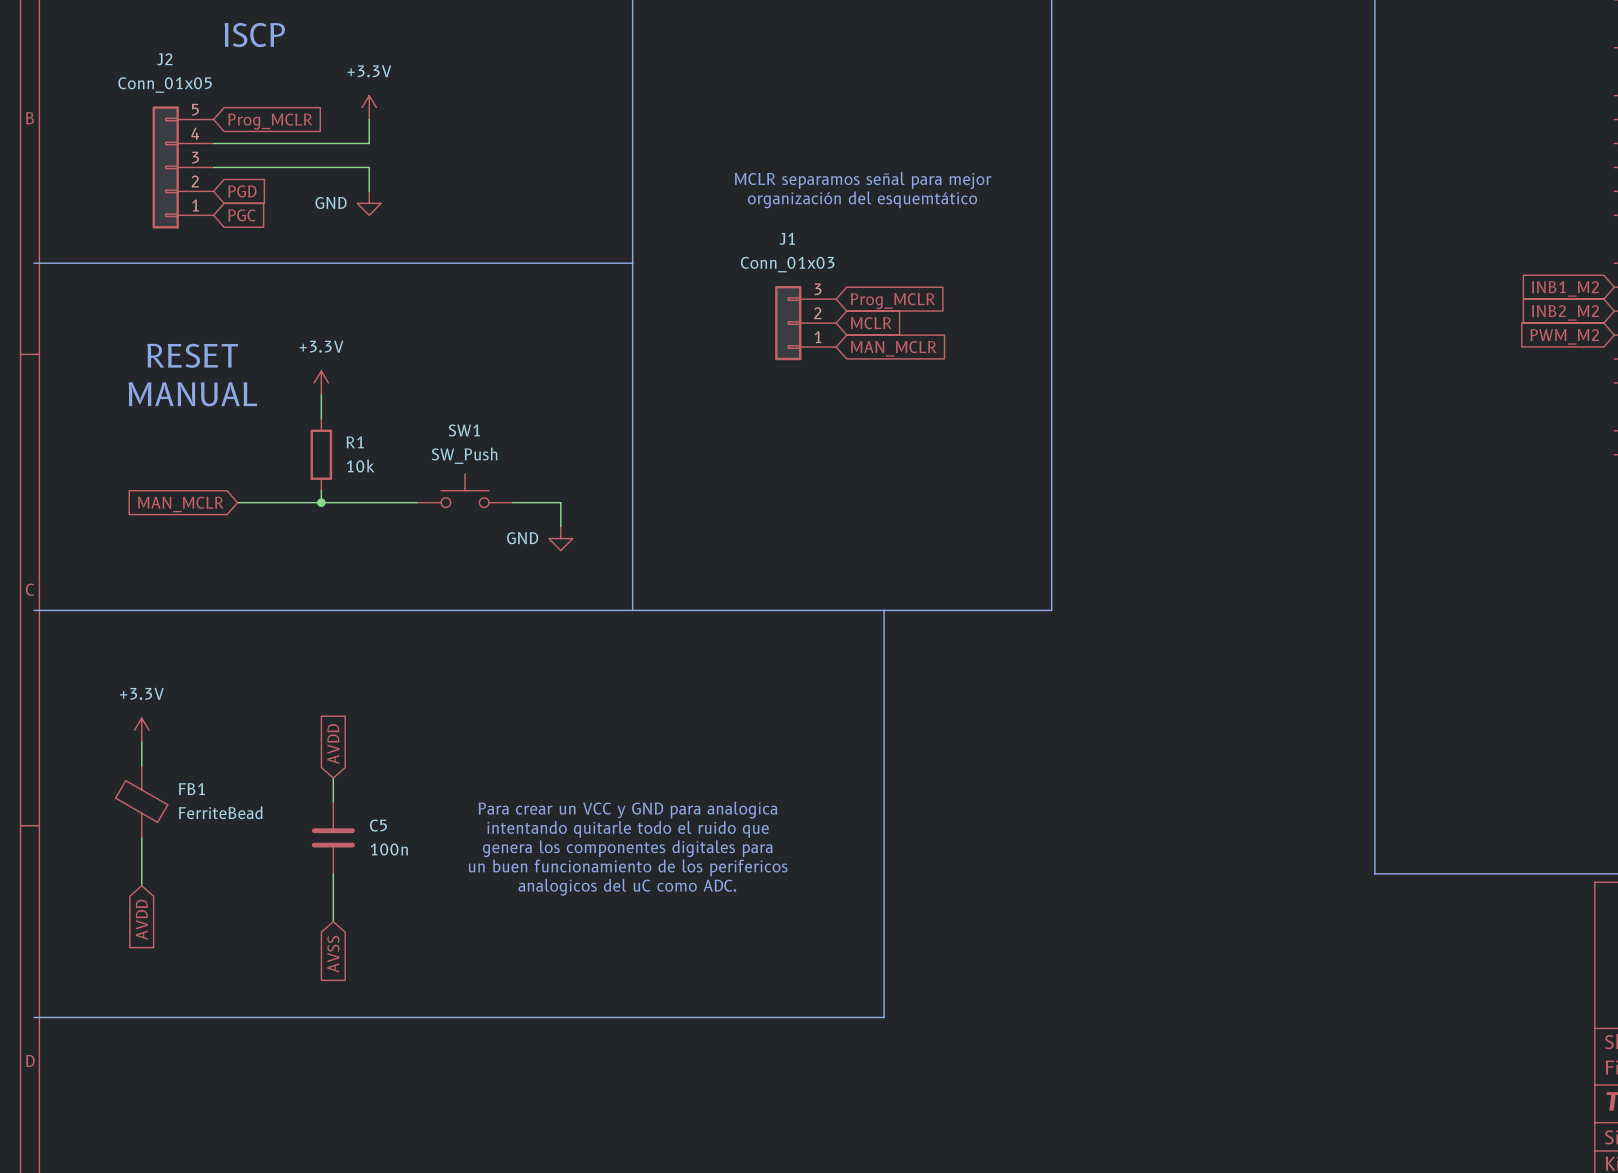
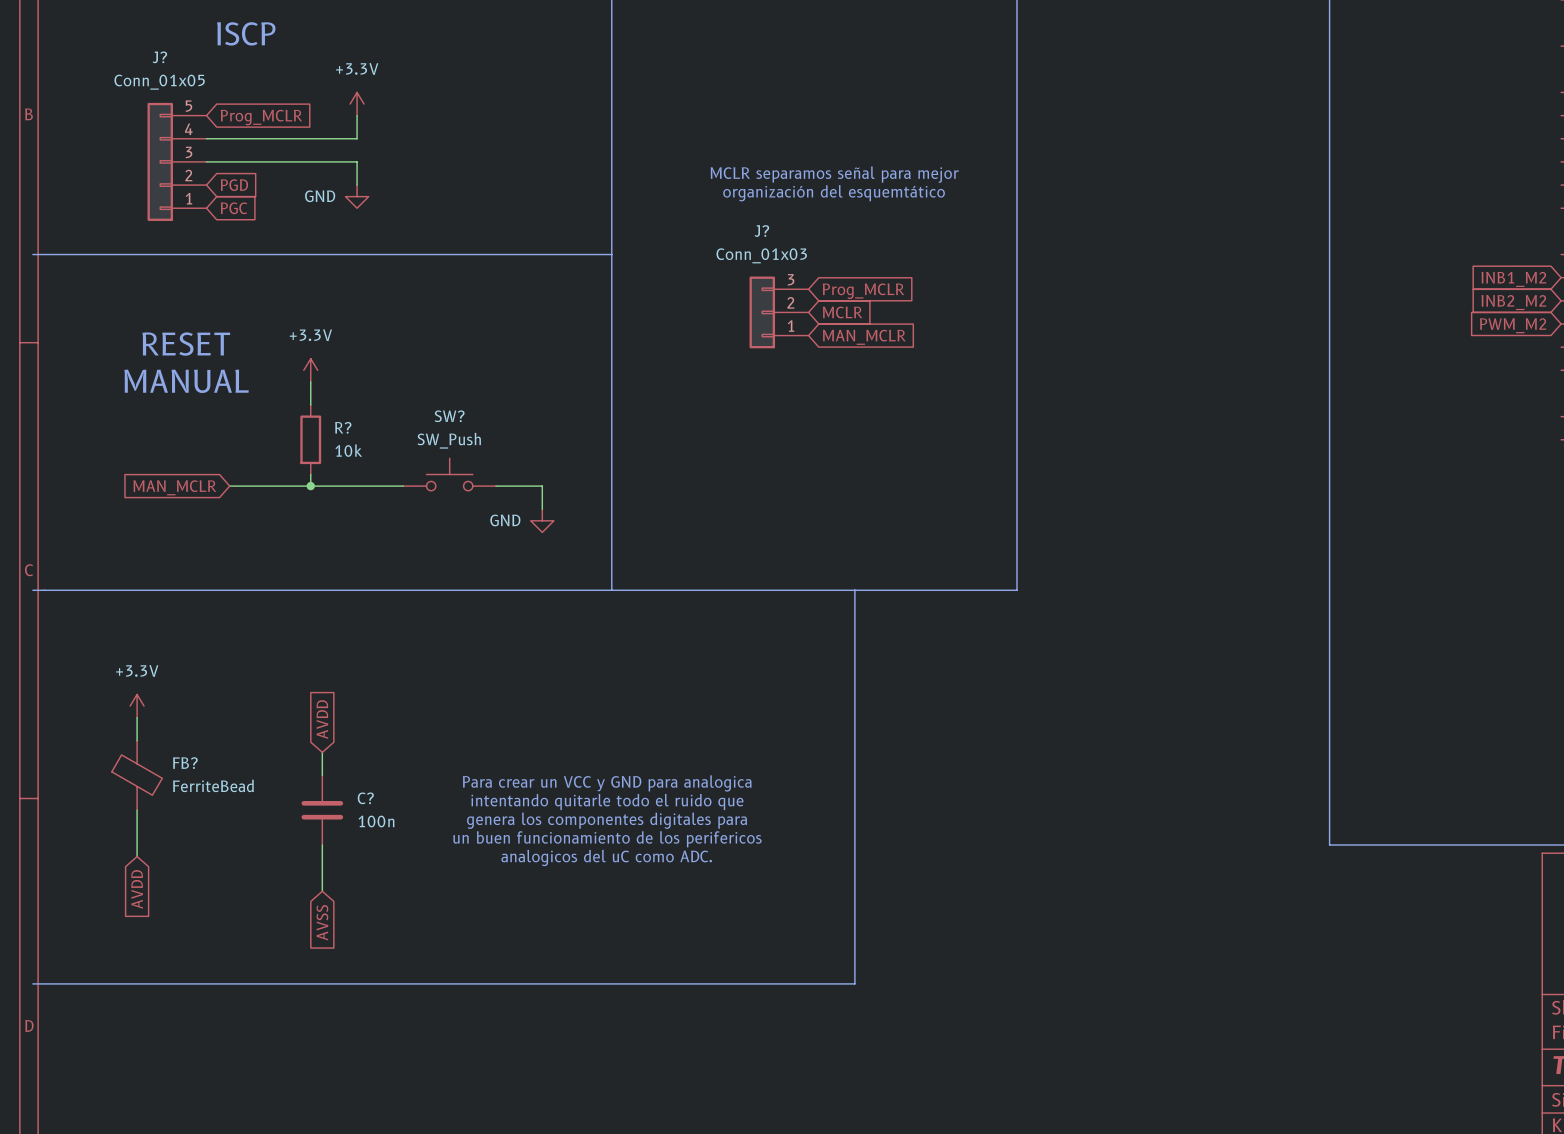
J2 name: J2 (164, 59) -> J? (159, 57)
J1 name: J1 (787, 238) -> J? (761, 231)
SW1 name: SW1 (464, 430) -> SW? (449, 416)
R1 name: R1 (355, 442) -> R? (343, 427)
FB1 name: FB1 (191, 789) -> FB? (185, 763)
C5 name: C5 (378, 825) -> C? (365, 798)

